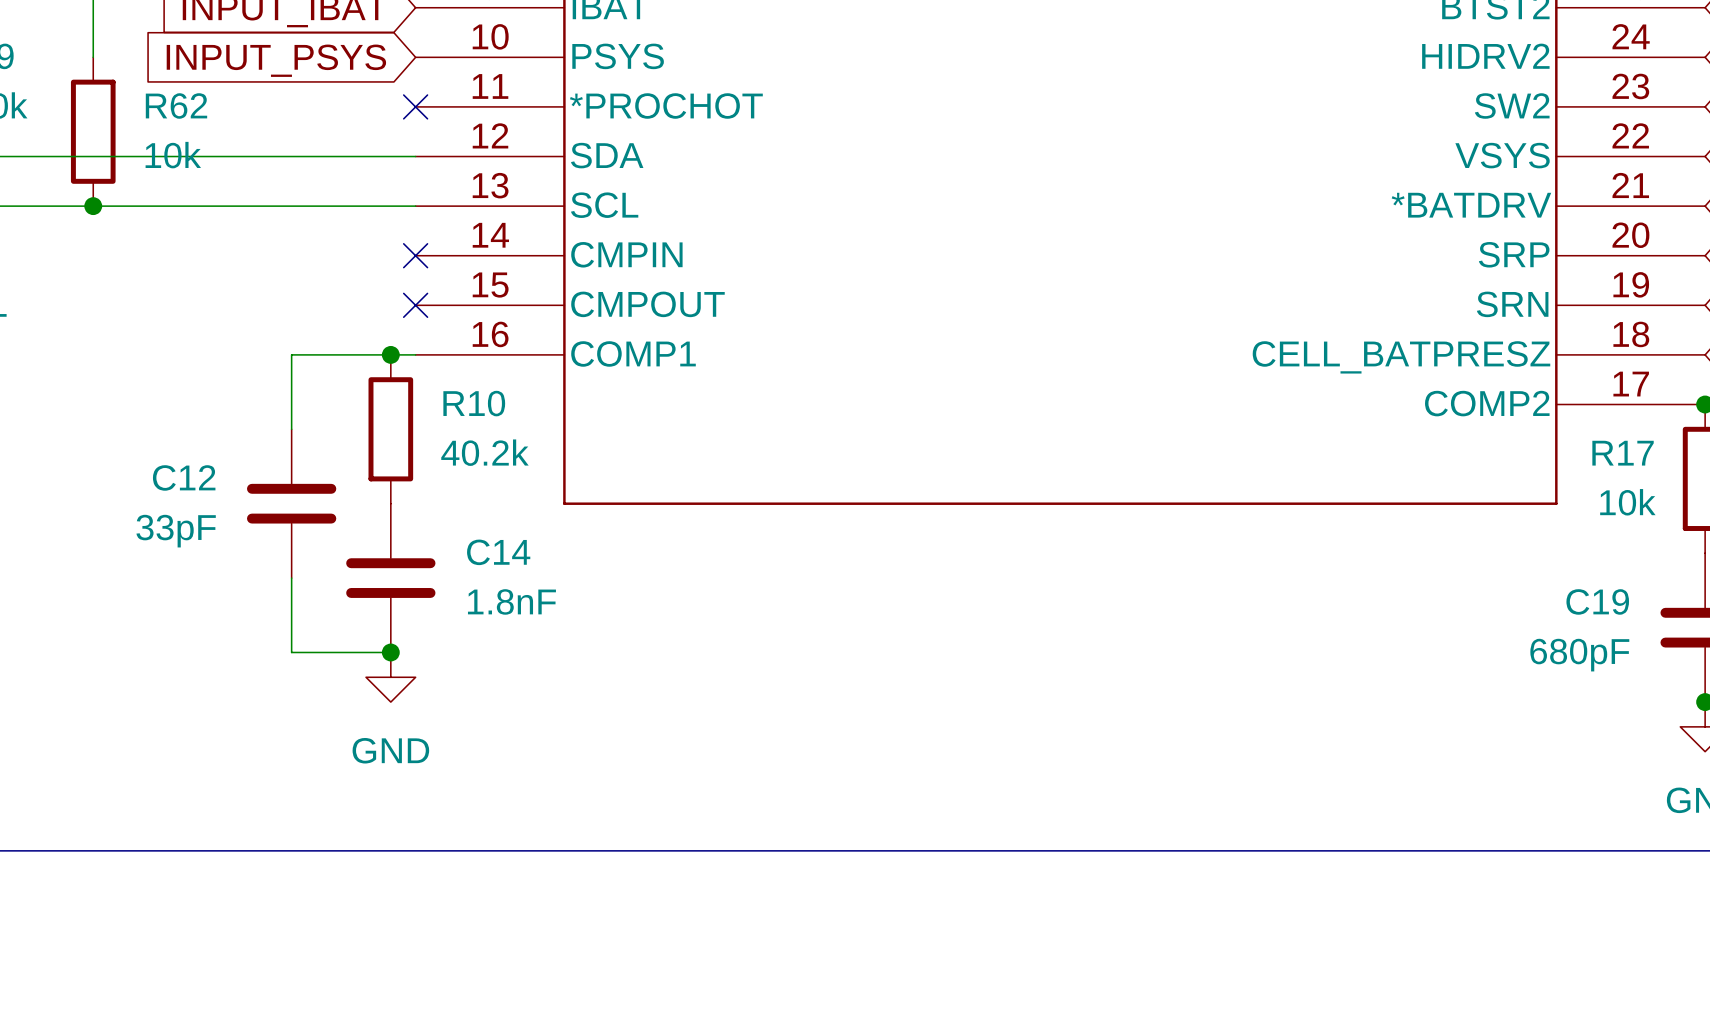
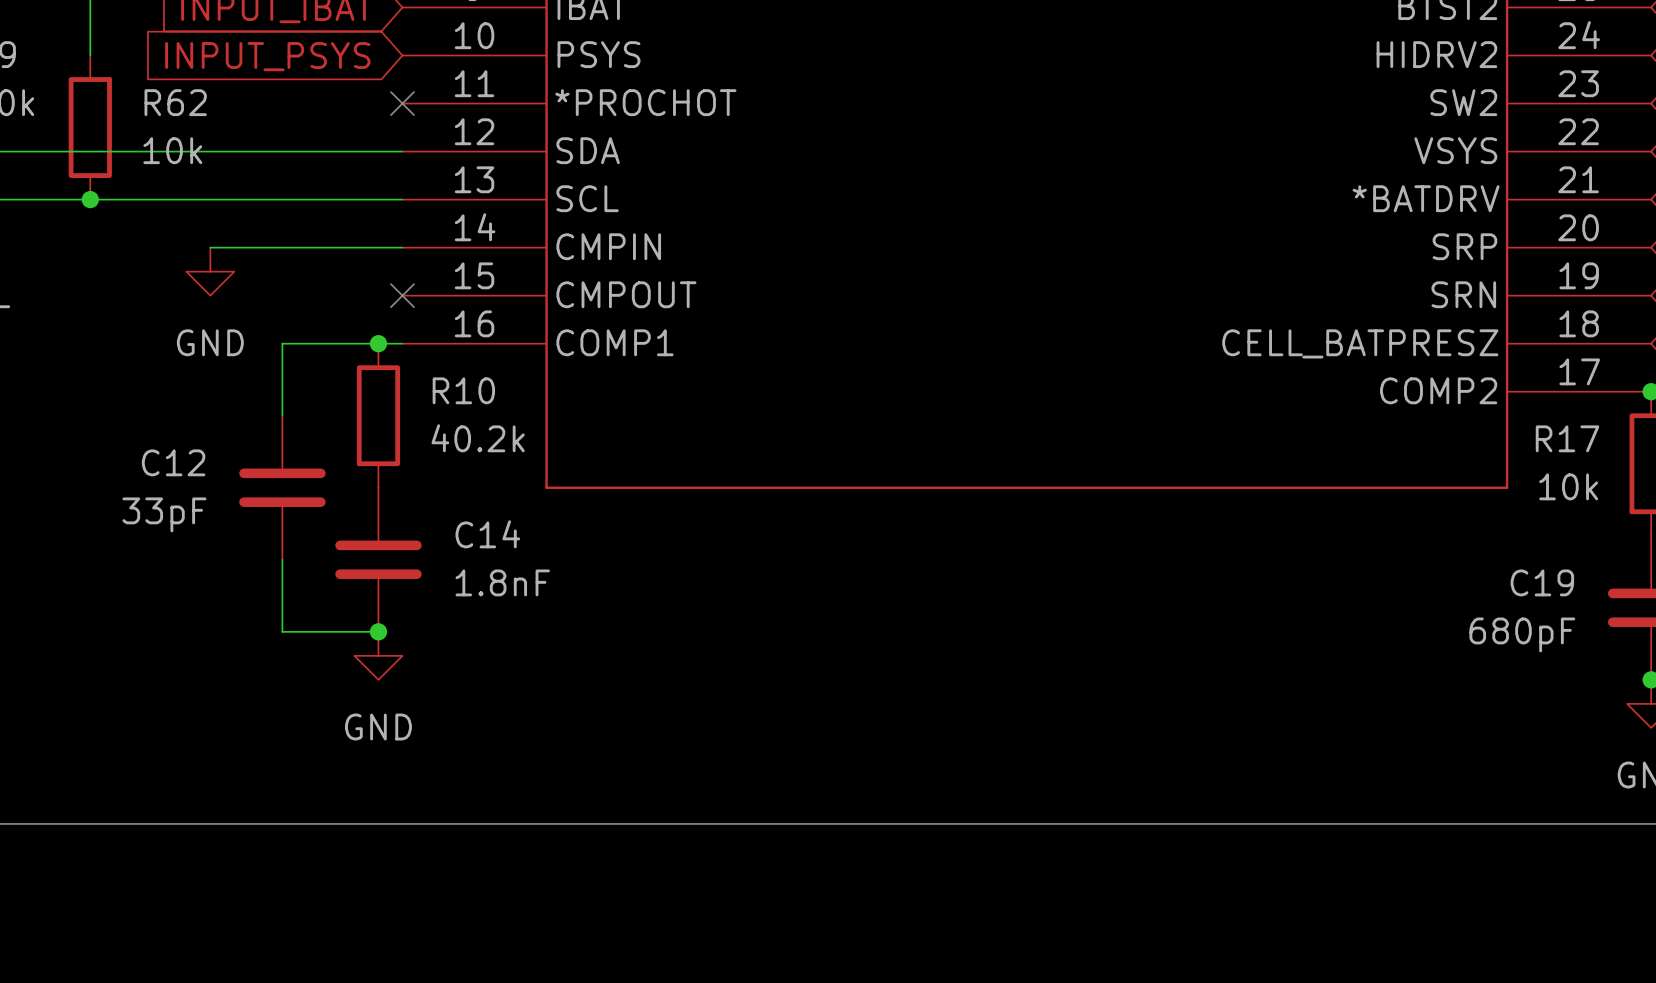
wire: none -> (210, 247) (402, 247)
no-connect mark: (415, 255) -> none
power symbol: none -> GND (210, 271)

